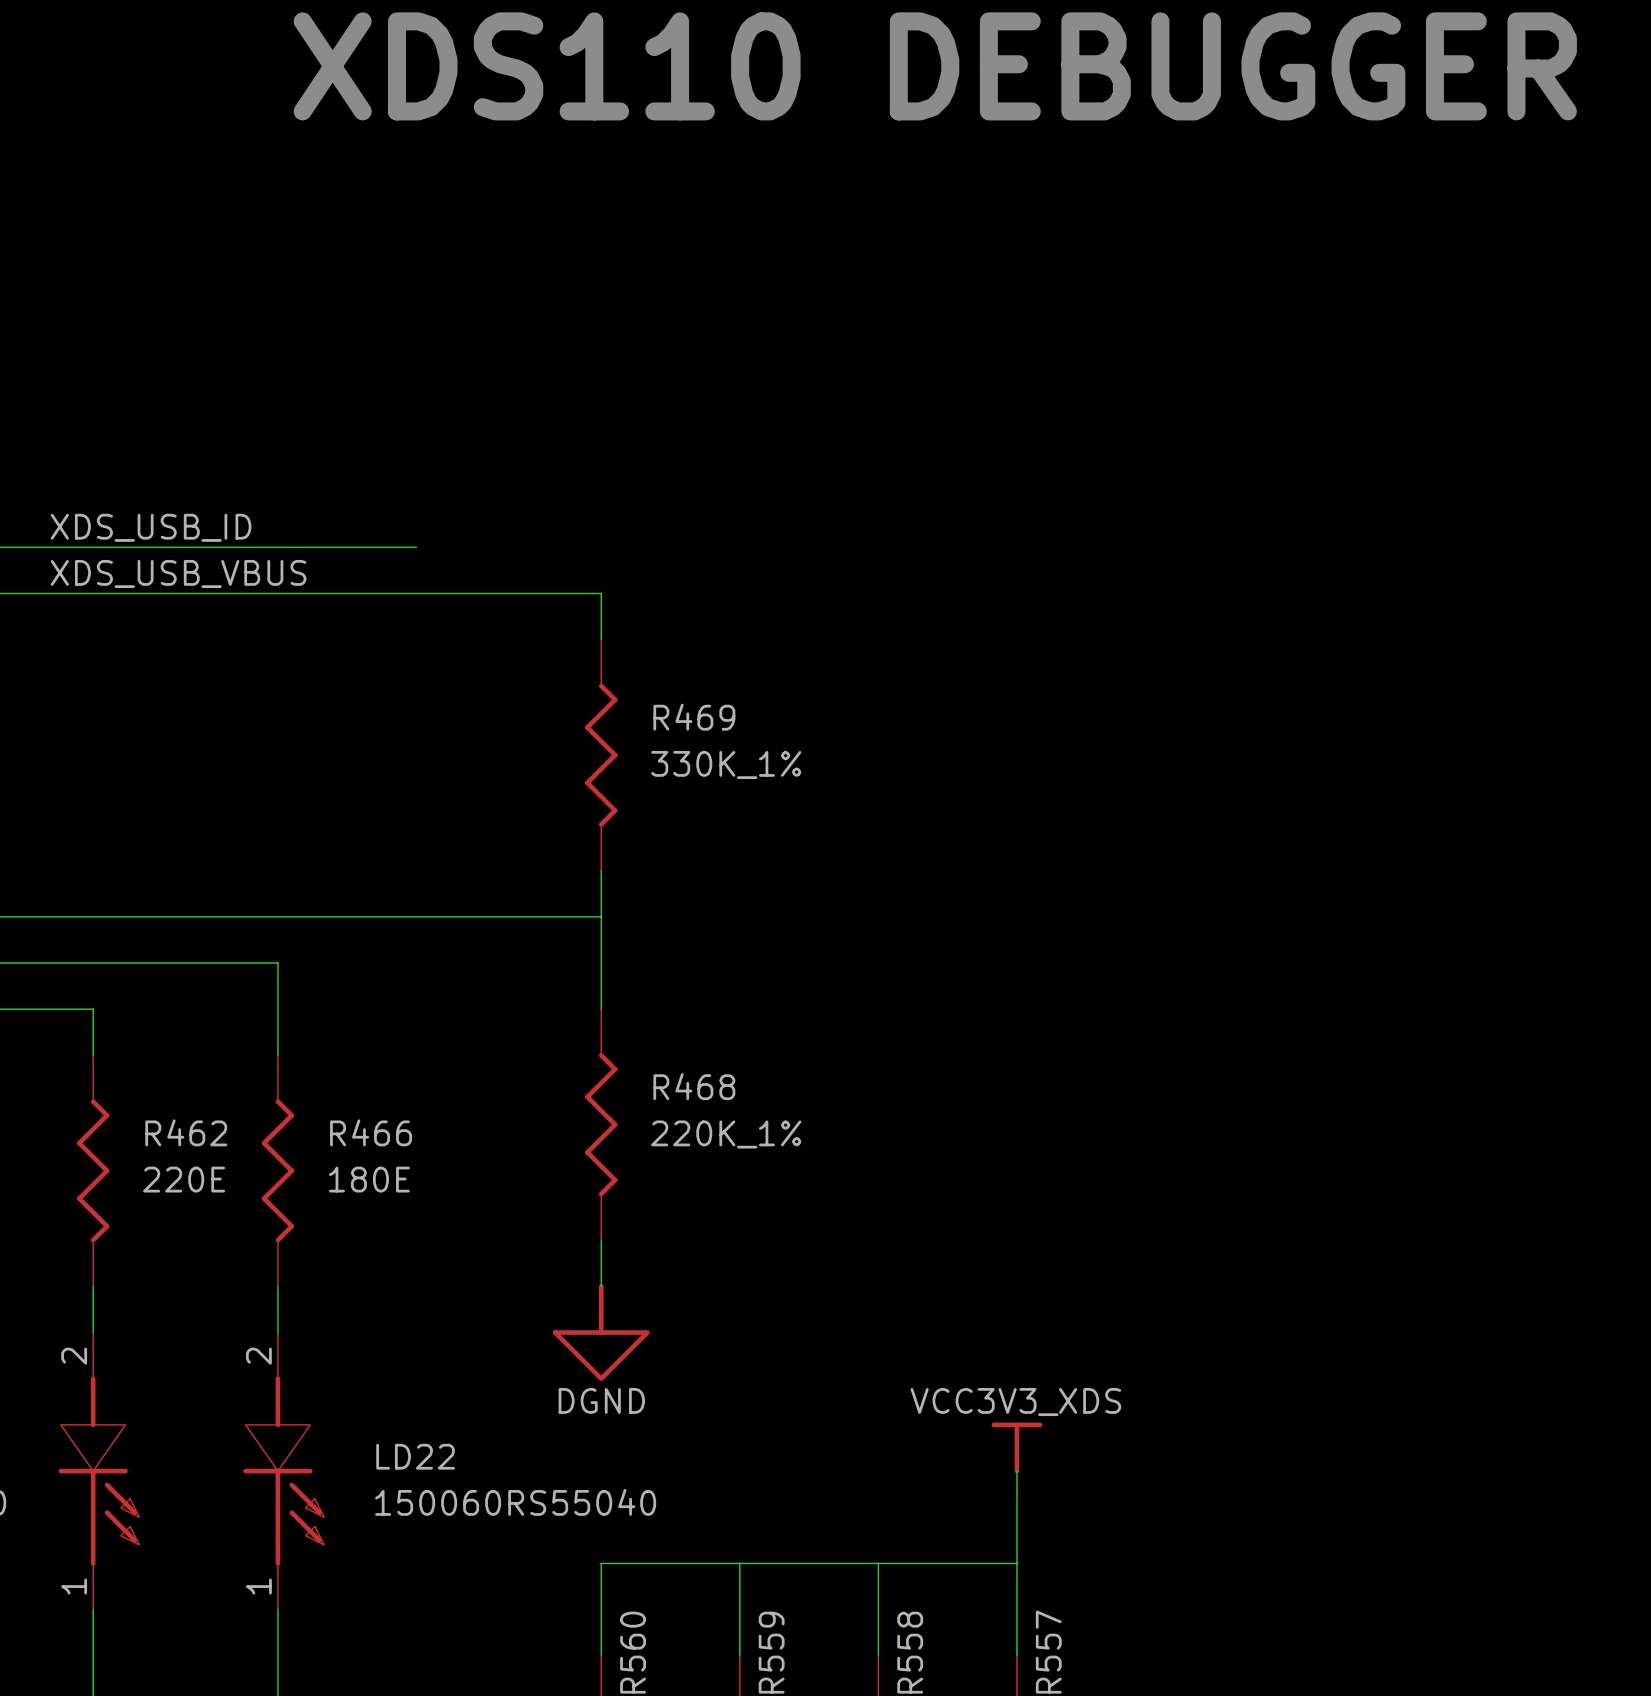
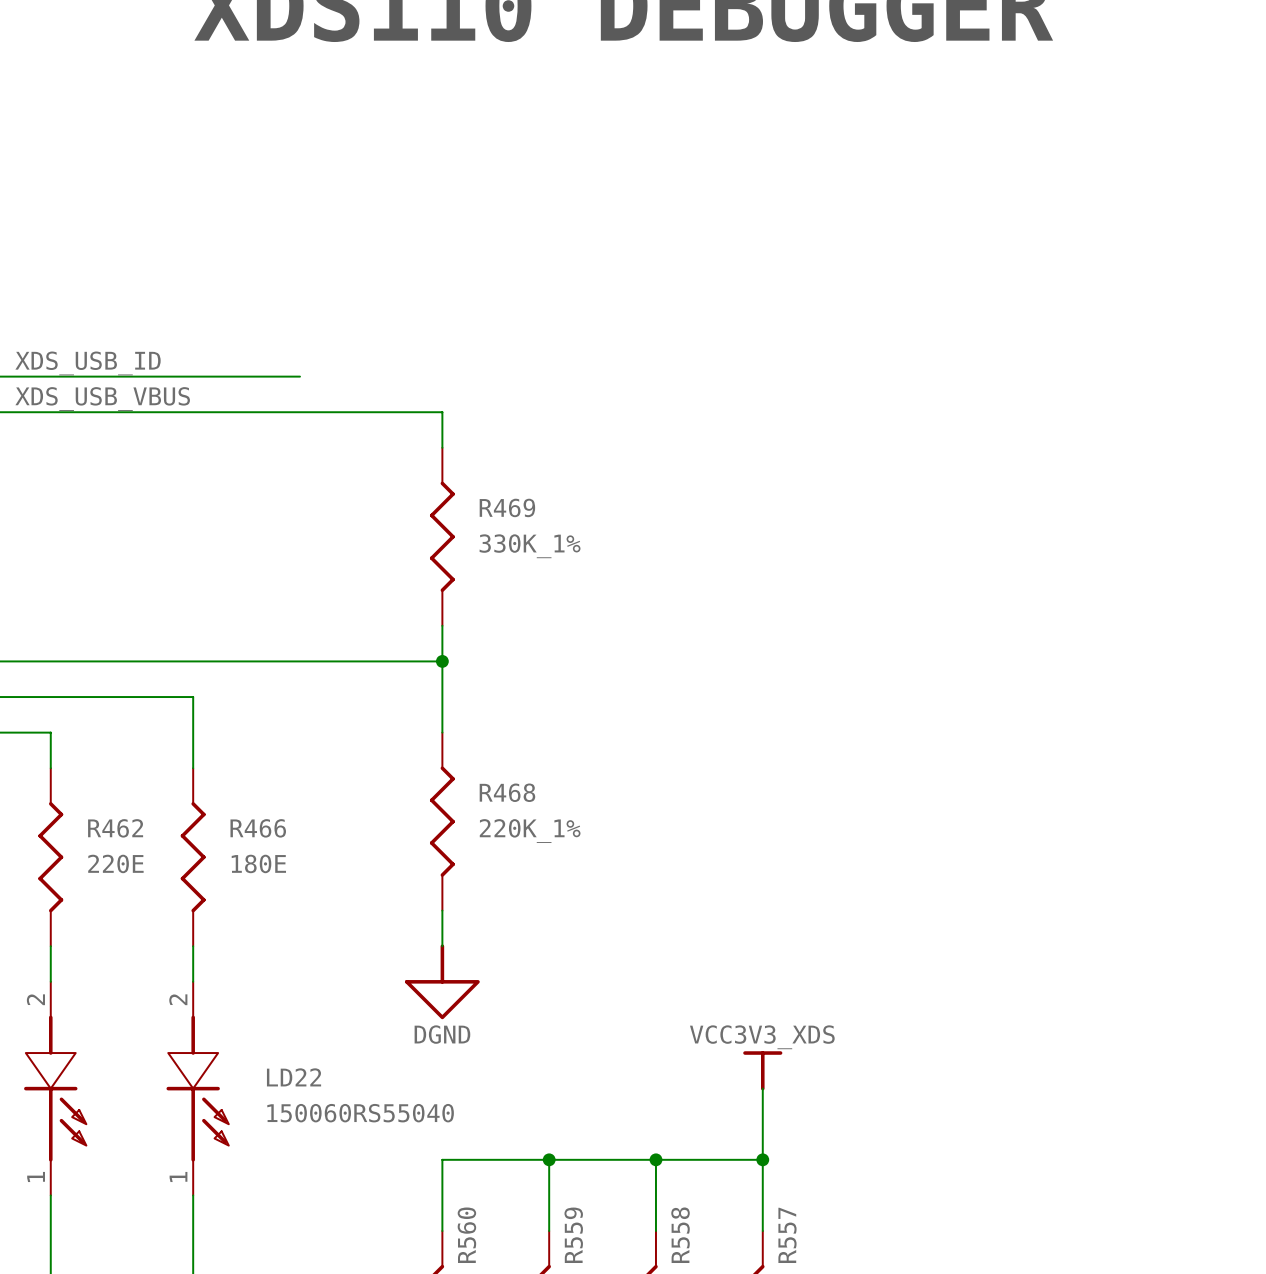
junction: none -> (442, 661)
junction: none -> (549, 1159)
junction: none -> (655, 1159)
junction: none -> (762, 1159)

